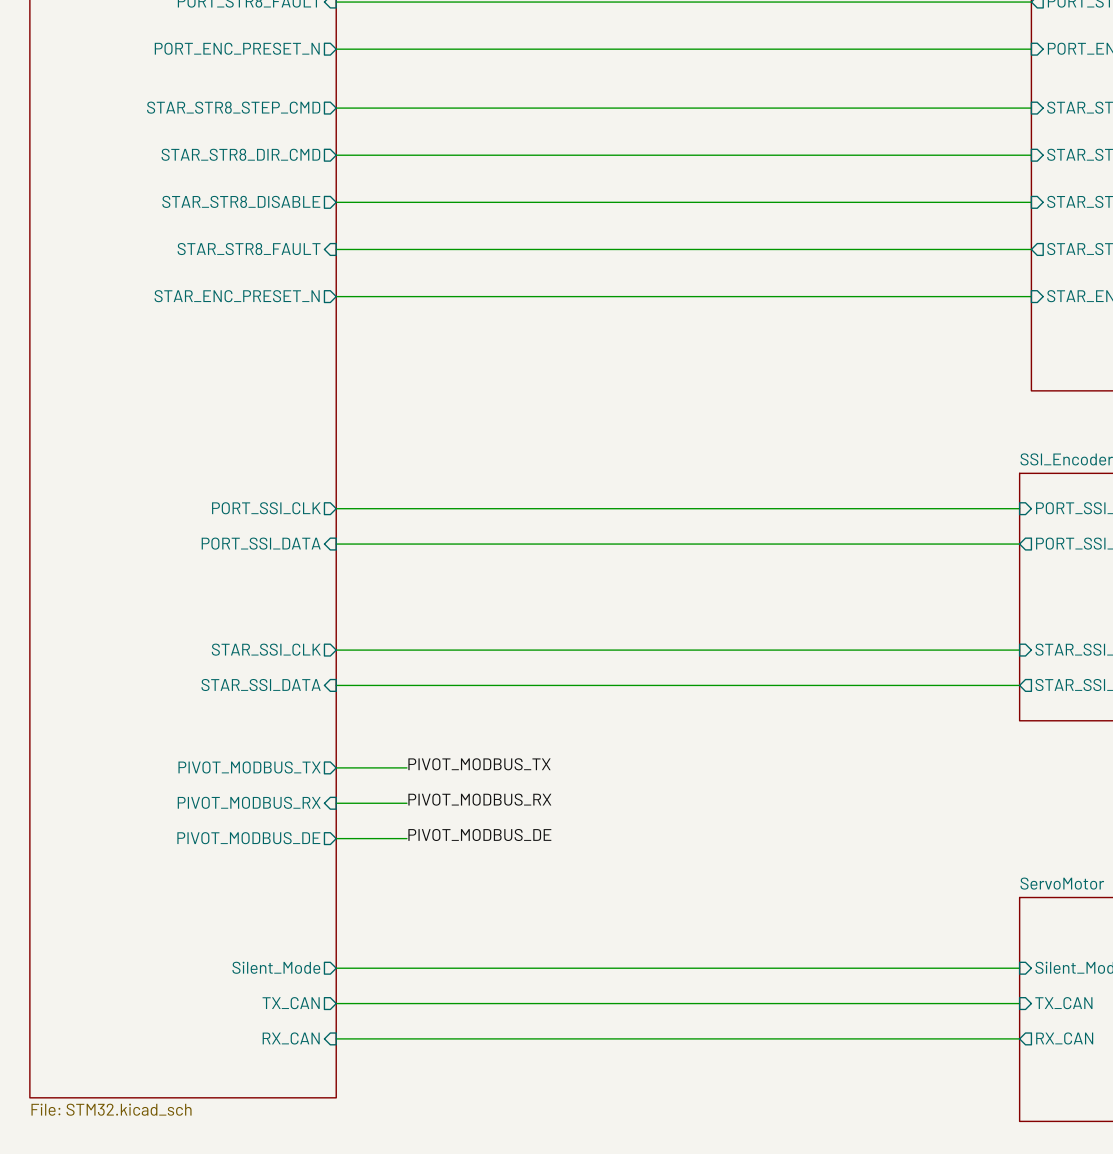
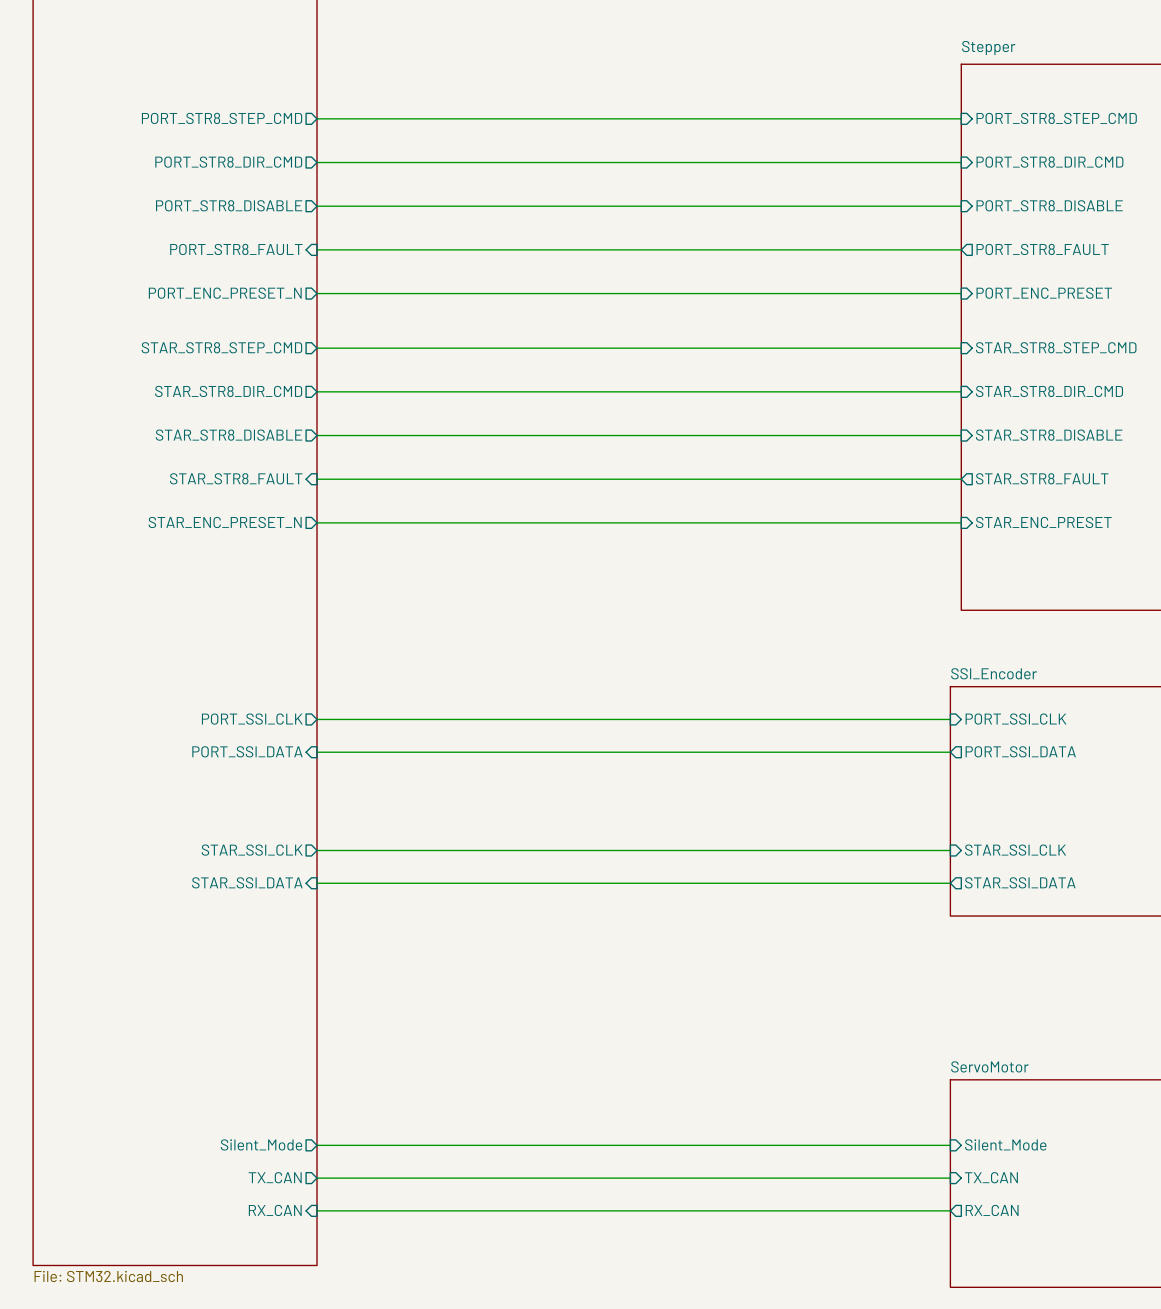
label: PIVOT_MODBUS_TX (479, 764) -> none
sheet pin: PIVOT_MODBUS_TX (249, 767) -> none
wire: (336, 767) (406, 767) -> none
label: PIVOT_MODBUS_RX (479, 799) -> none
sheet pin: PIVOT_MODBUS_RX (249, 802) -> none
wire: (336, 803) (406, 803) -> none
label: PIVOT_MODBUS_DE (479, 834) -> none
sheet pin: PIVOT_MODBUS_DE (248, 838) -> none
wire: (336, 838) (406, 838) -> none

